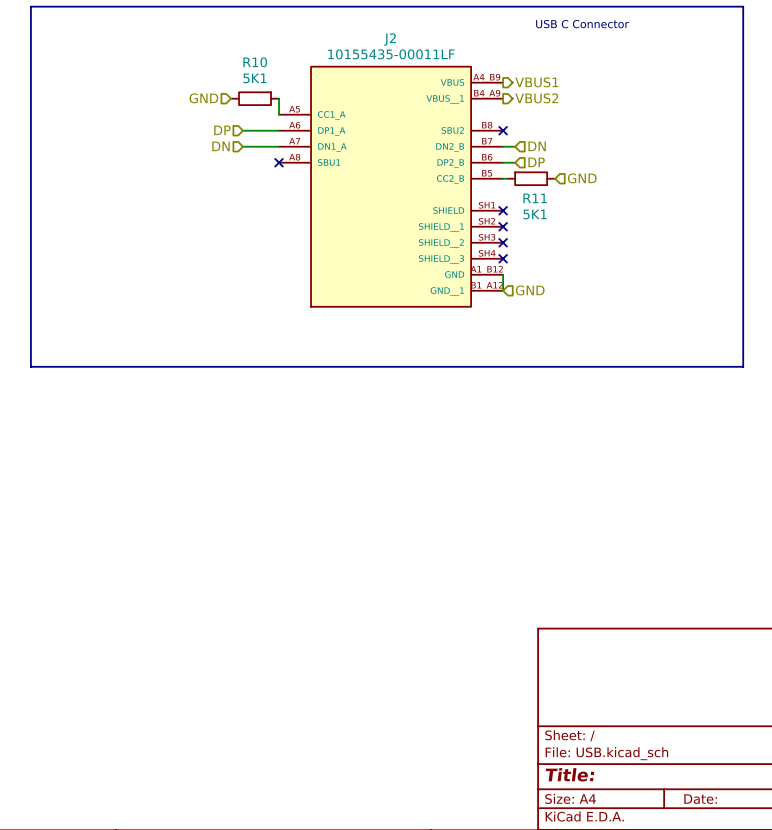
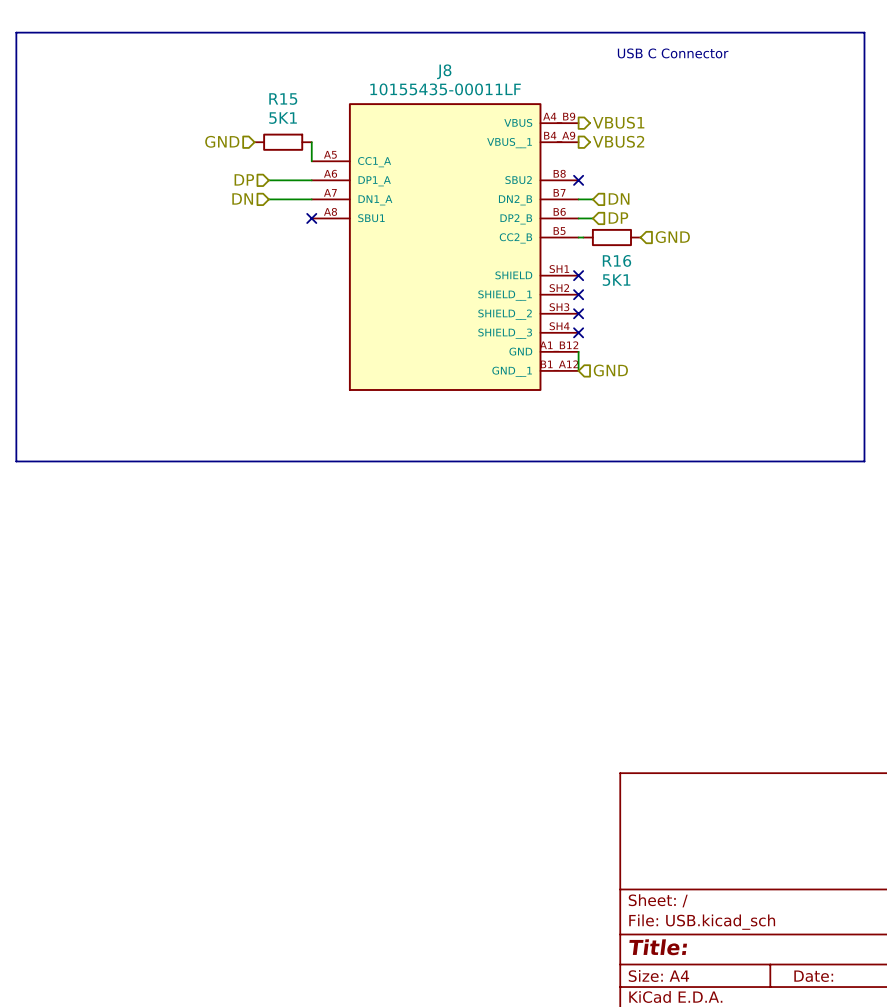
J2 name: J2 (390, 39) -> J8 (444, 71)
R10 name: R10 (255, 62) -> R15 (283, 99)
R11 name: R11 (535, 198) -> R16 (616, 260)

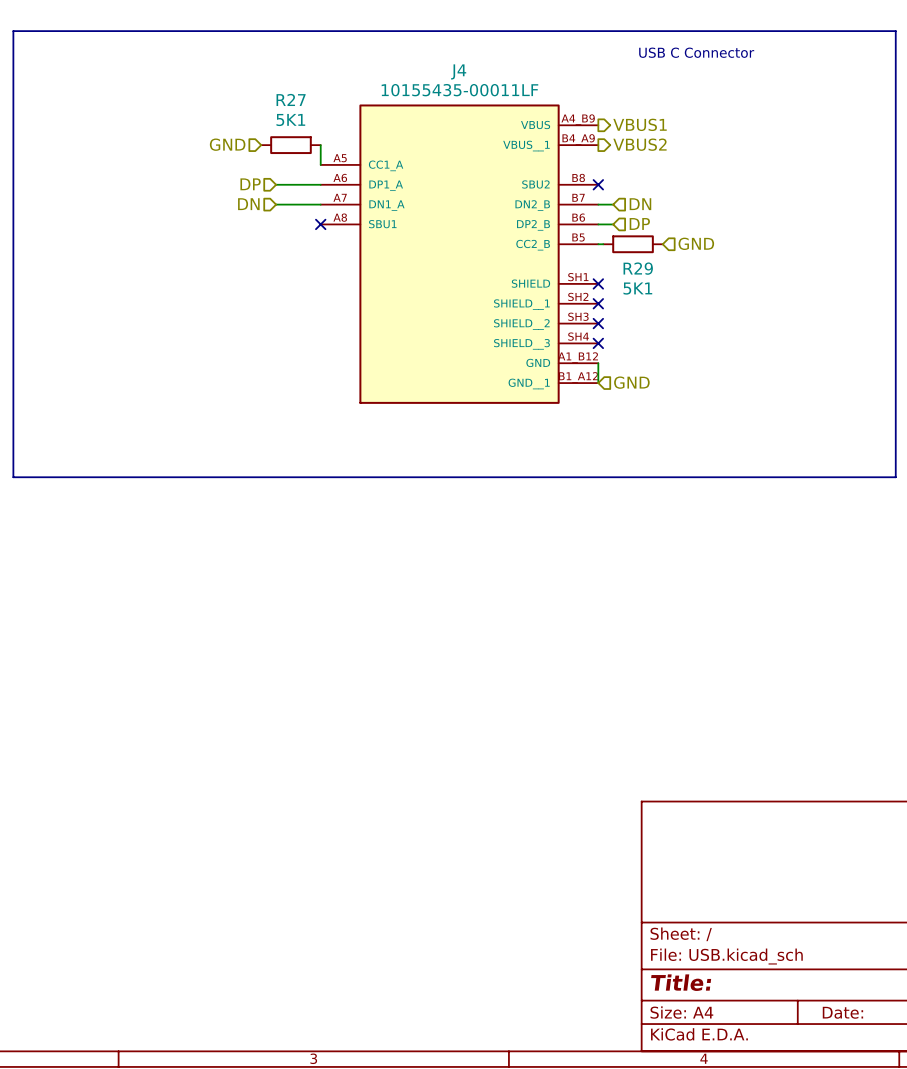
J8 name: J8 (444, 71) -> J4 (458, 71)
R15 name: R15 (283, 99) -> R27 (291, 99)
R16 name: R16 (616, 260) -> R29 (638, 268)

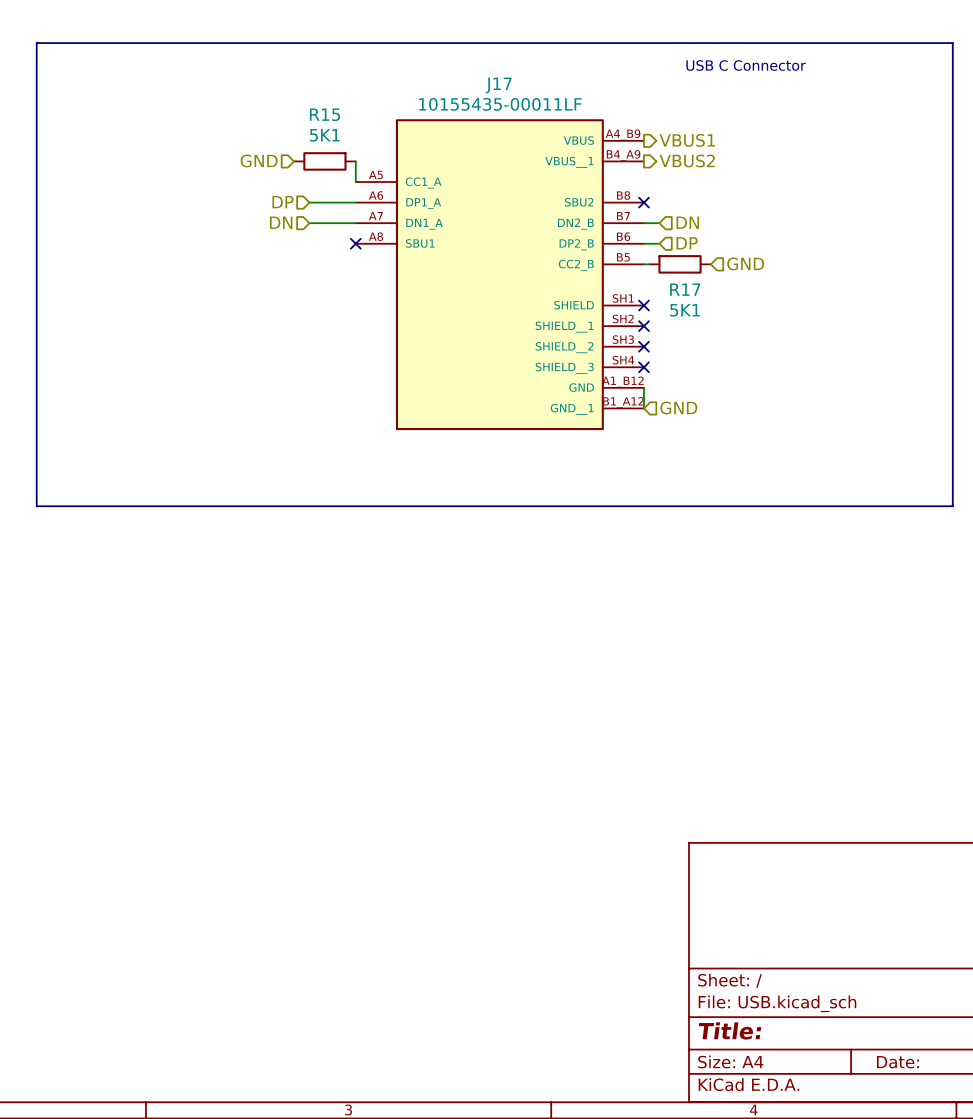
J4 name: J4 (458, 71) -> J17 (498, 85)
R27 name: R27 (291, 99) -> R15 (325, 114)
R29 name: R29 (638, 268) -> R17 (685, 289)

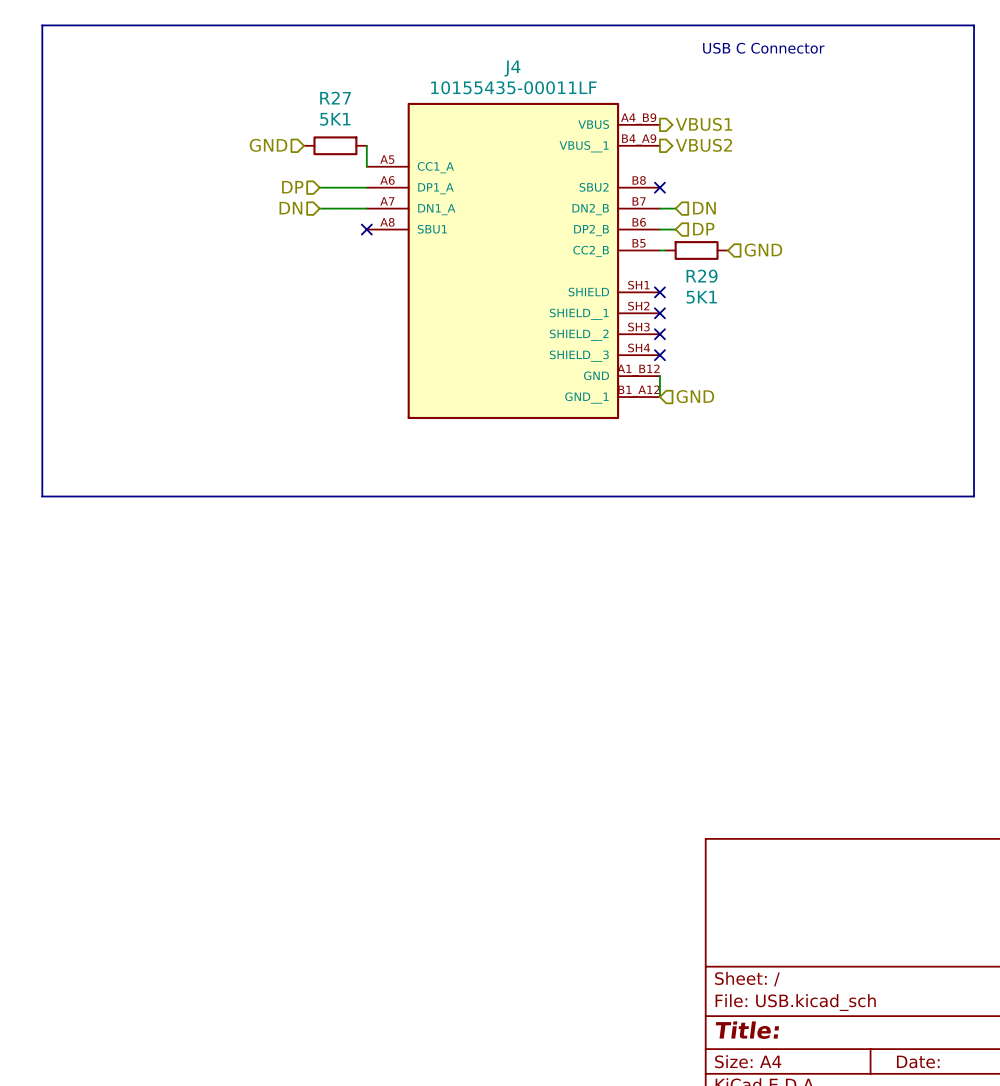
J17 name: J17 (498, 85) -> J4 (512, 68)
R15 name: R15 (325, 114) -> R27 (335, 98)
R17 name: R17 (685, 289) -> R29 (702, 276)

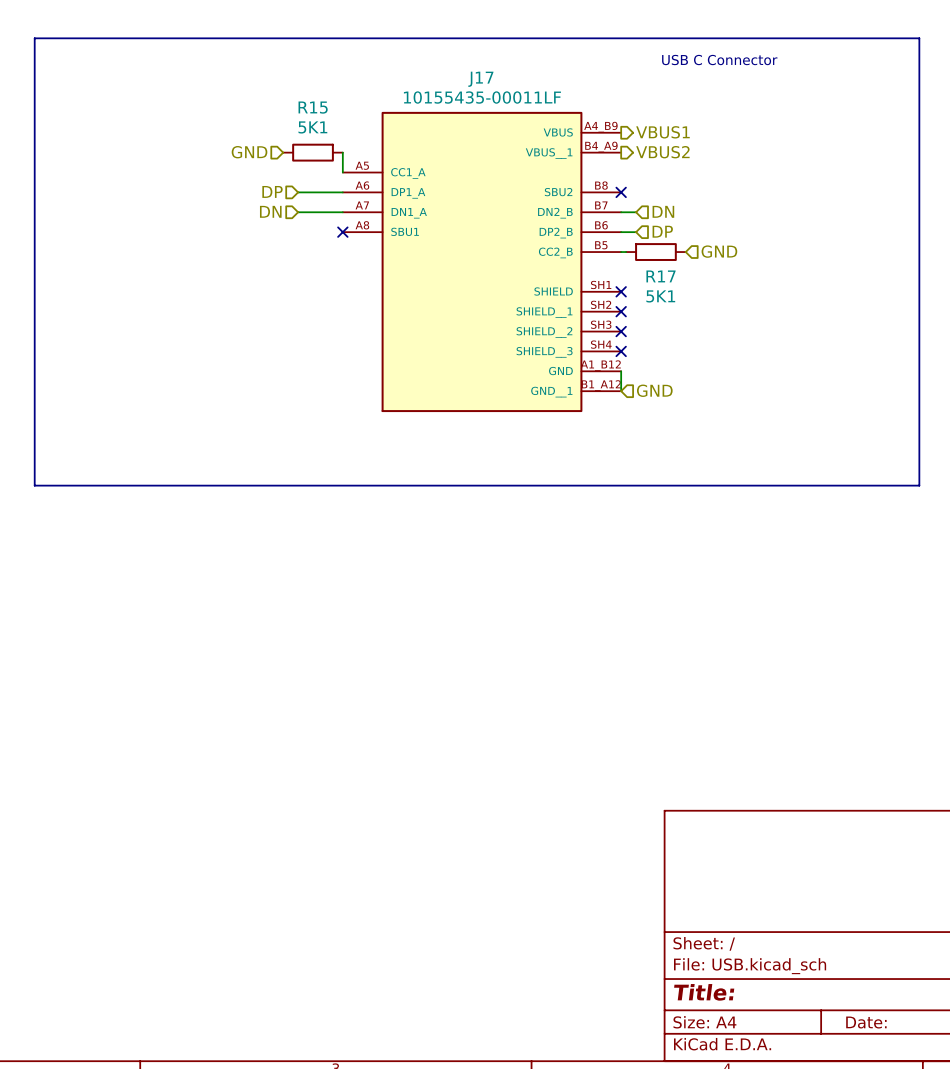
J4 name: J4 (512, 68) -> J17 (480, 79)
R27 name: R27 (335, 98) -> R15 (313, 107)
R29 name: R29 (702, 276) -> R17 (661, 276)

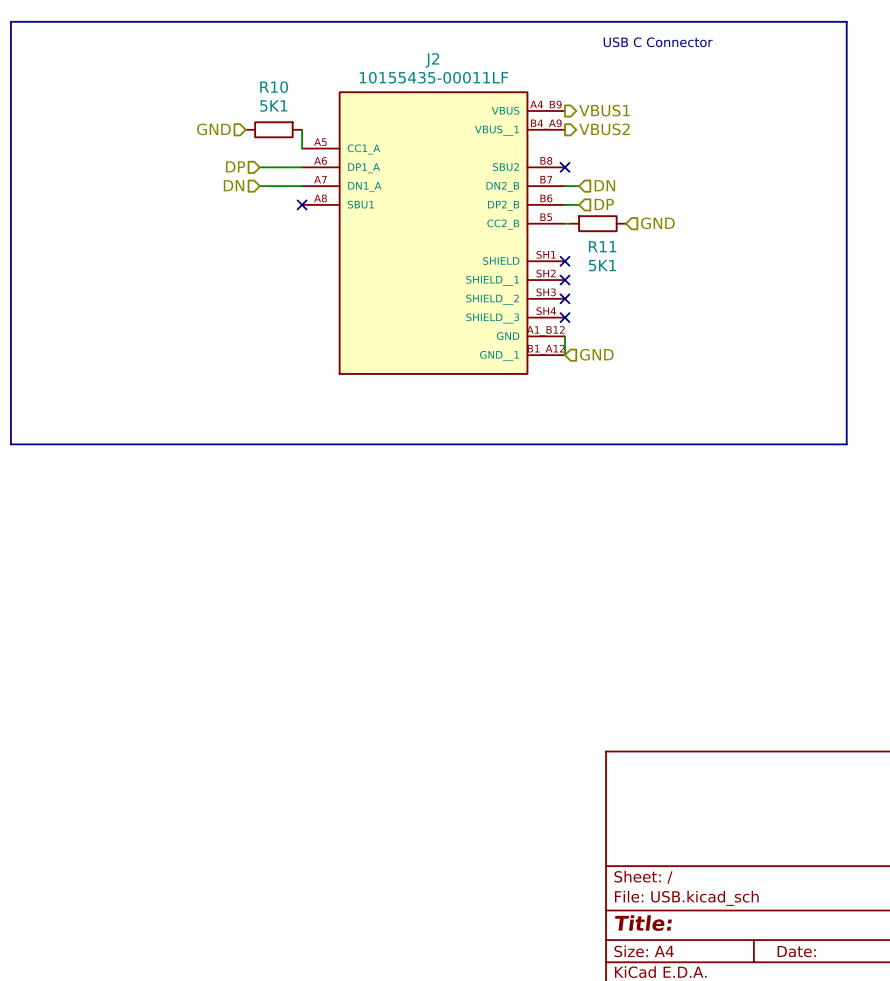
J17 name: J17 (480, 79) -> J2 (432, 60)
R15 name: R15 (313, 107) -> R10 (274, 87)
R17 name: R17 (661, 276) -> R11 (602, 246)

